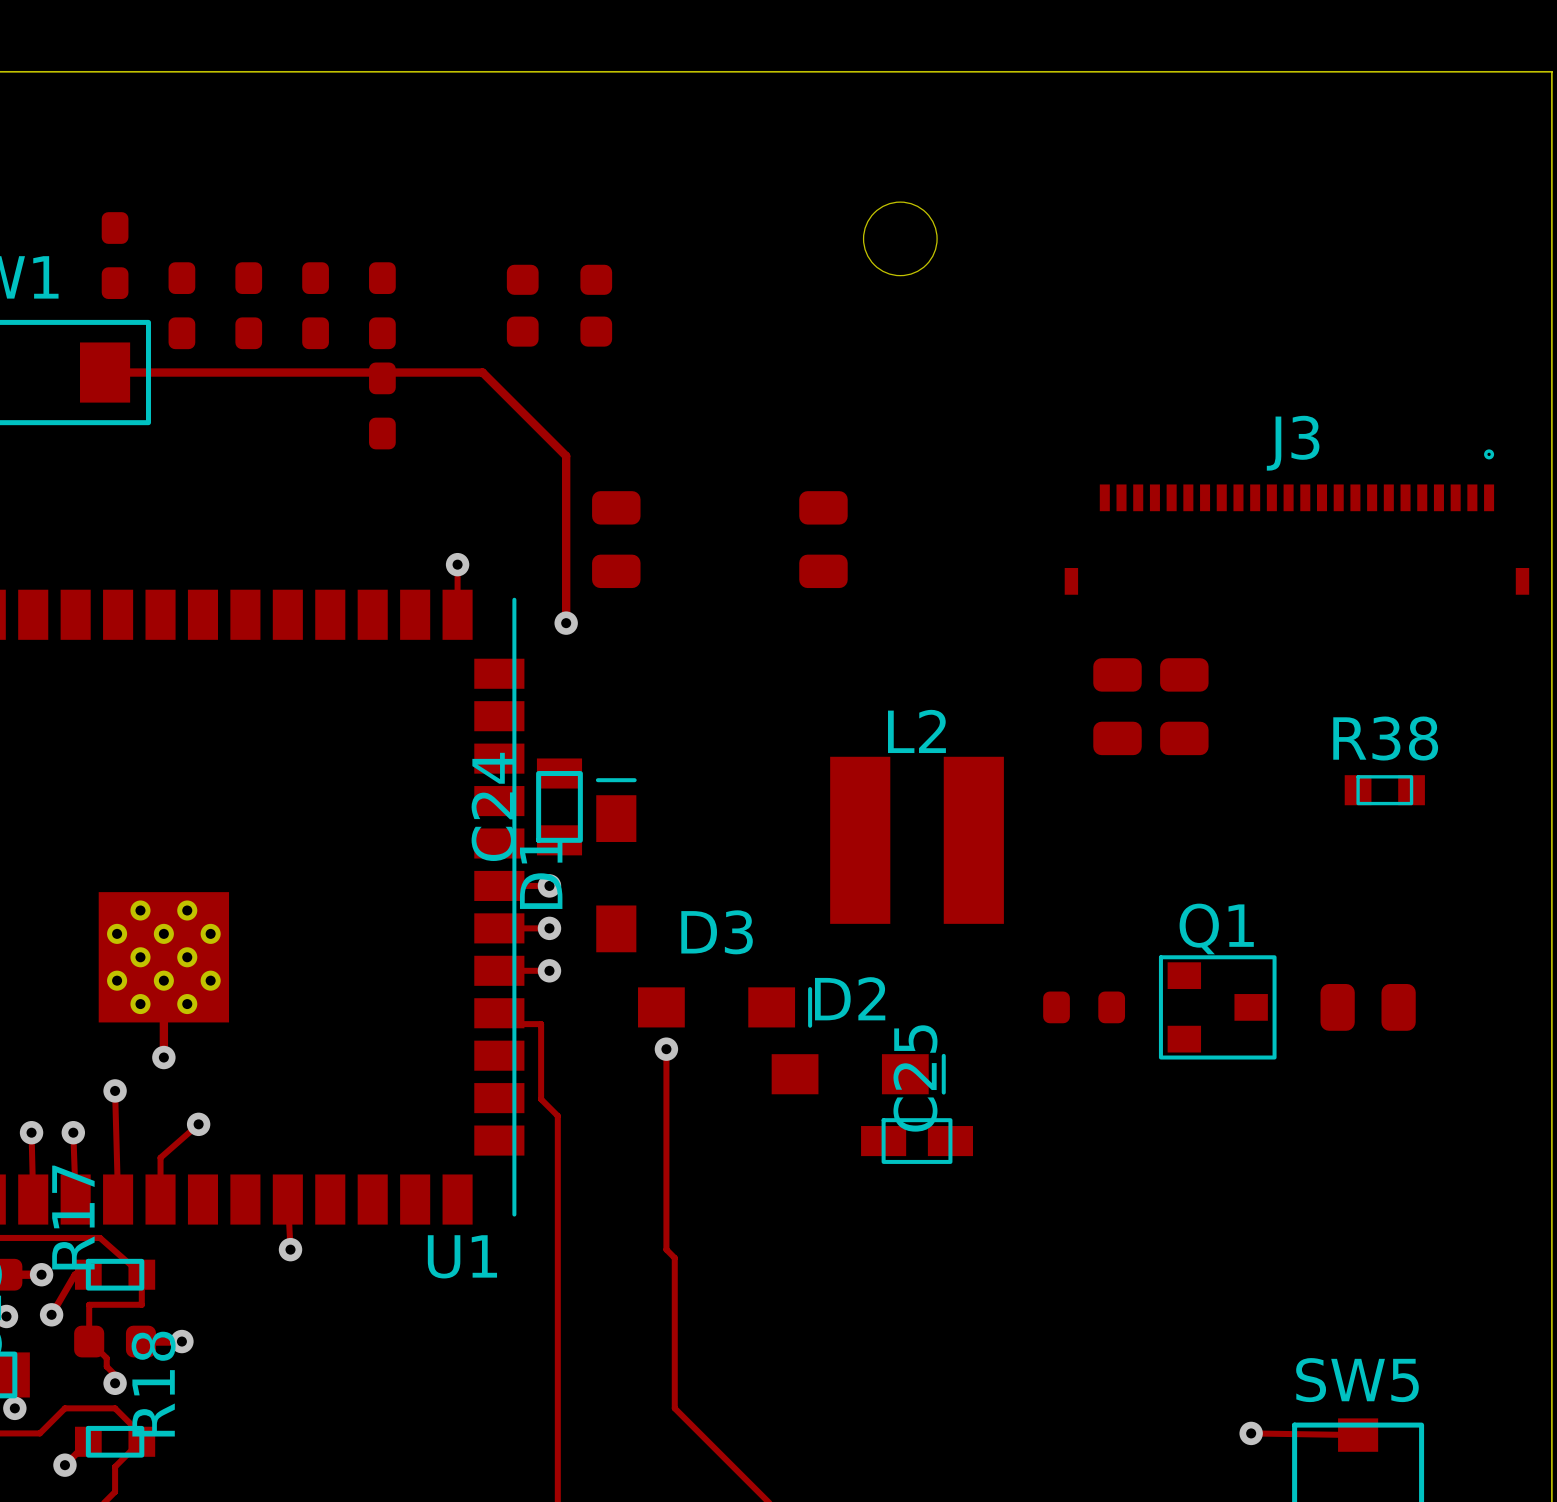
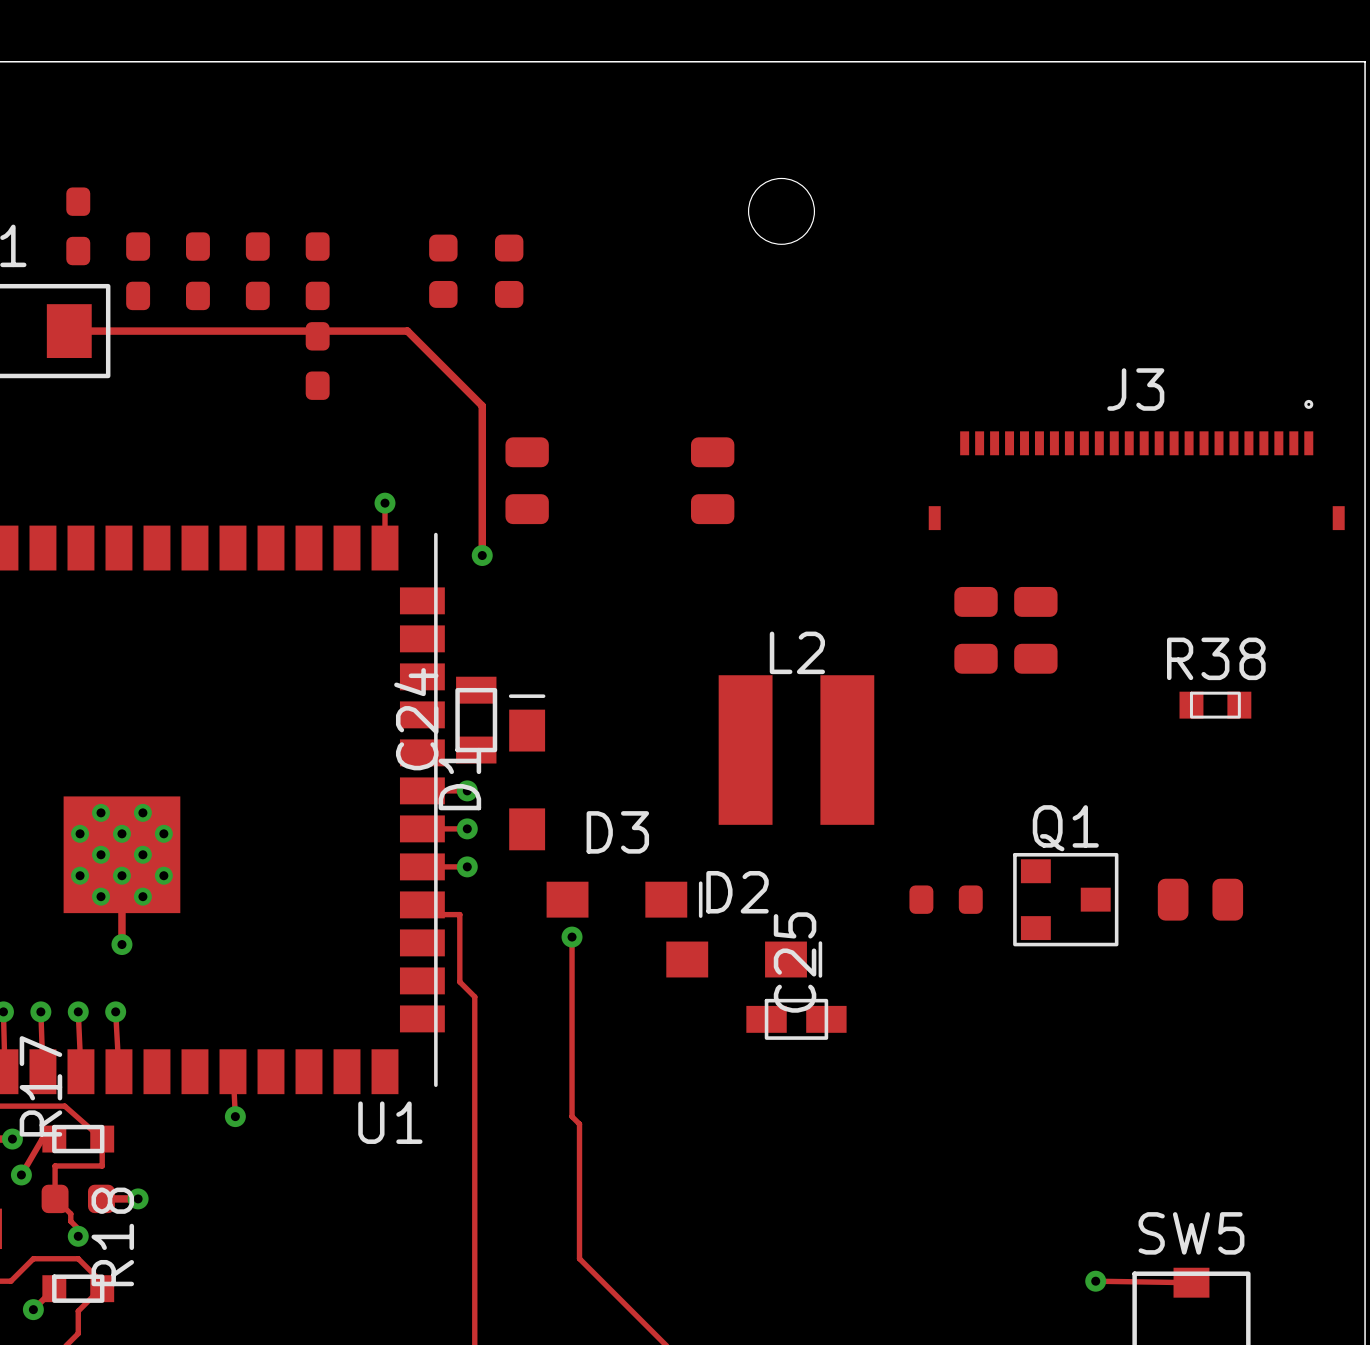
track: (115, 1090) (118, 1199) -> (78, 1011) (80, 1071)
via: (115, 1090) -> none
track: (198, 1124) (160, 1157) (160, 1199) -> (115, 1011) (118, 1071)
via: (198, 1124) -> none
via: none -> (78, 1011)
via: none -> (115, 1011)

